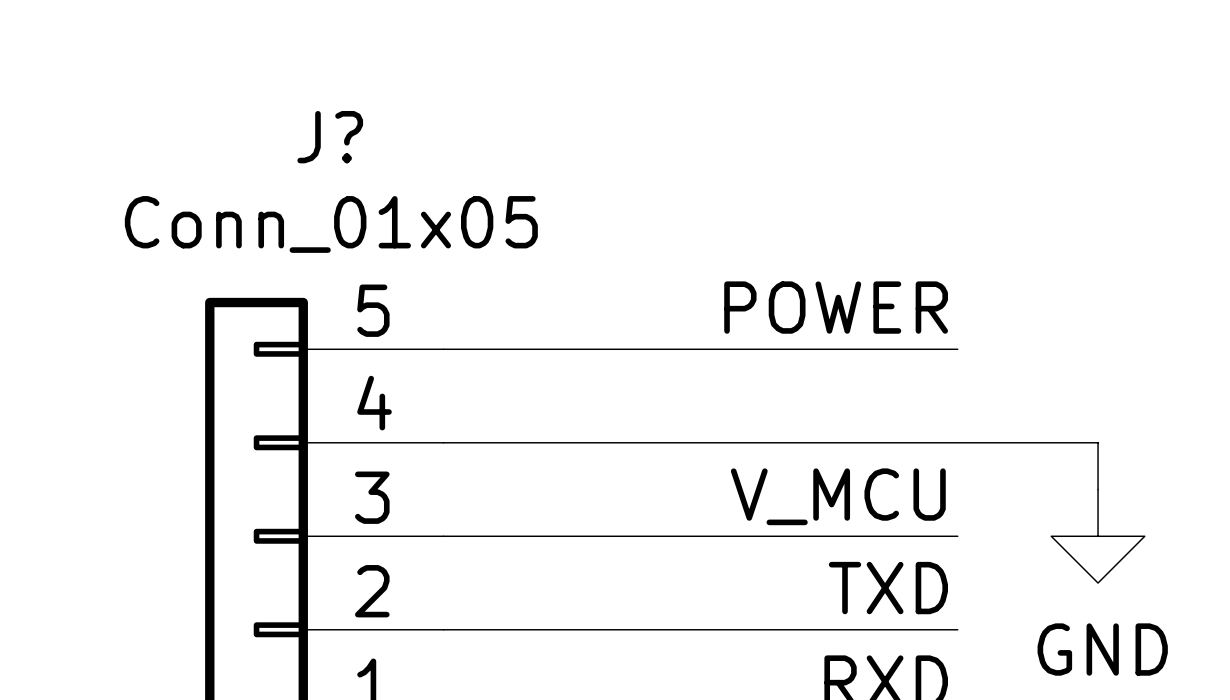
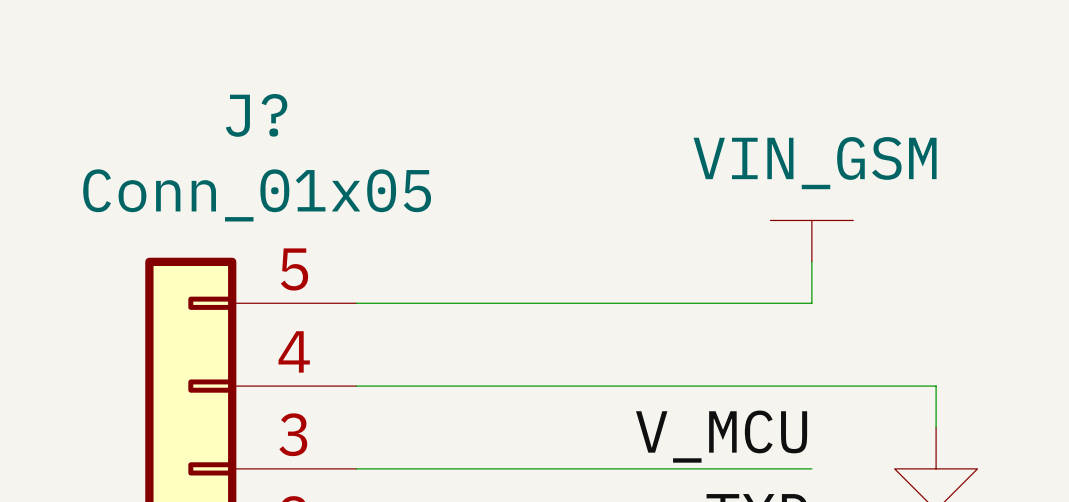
power symbol: none -> VIN_GSM (811, 241)
wire: none -> (811, 261) (811, 303)
label: POWER (836, 307) -> none

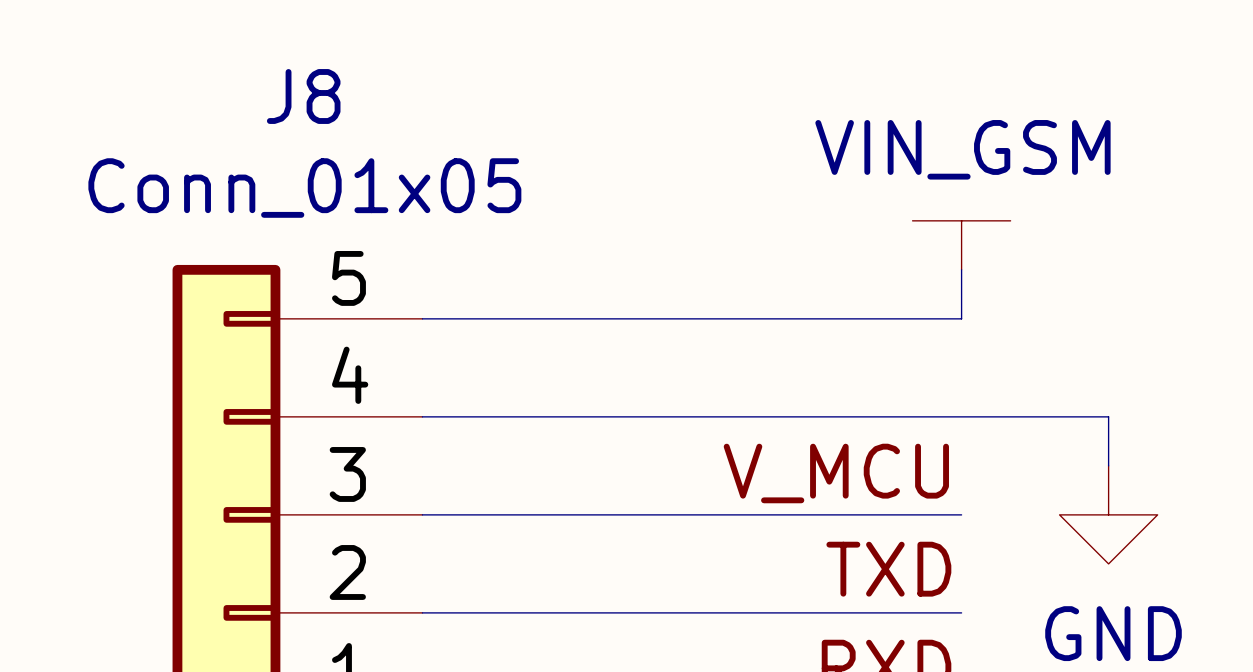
J? name: J? (256, 115) -> J8 (303, 96)

